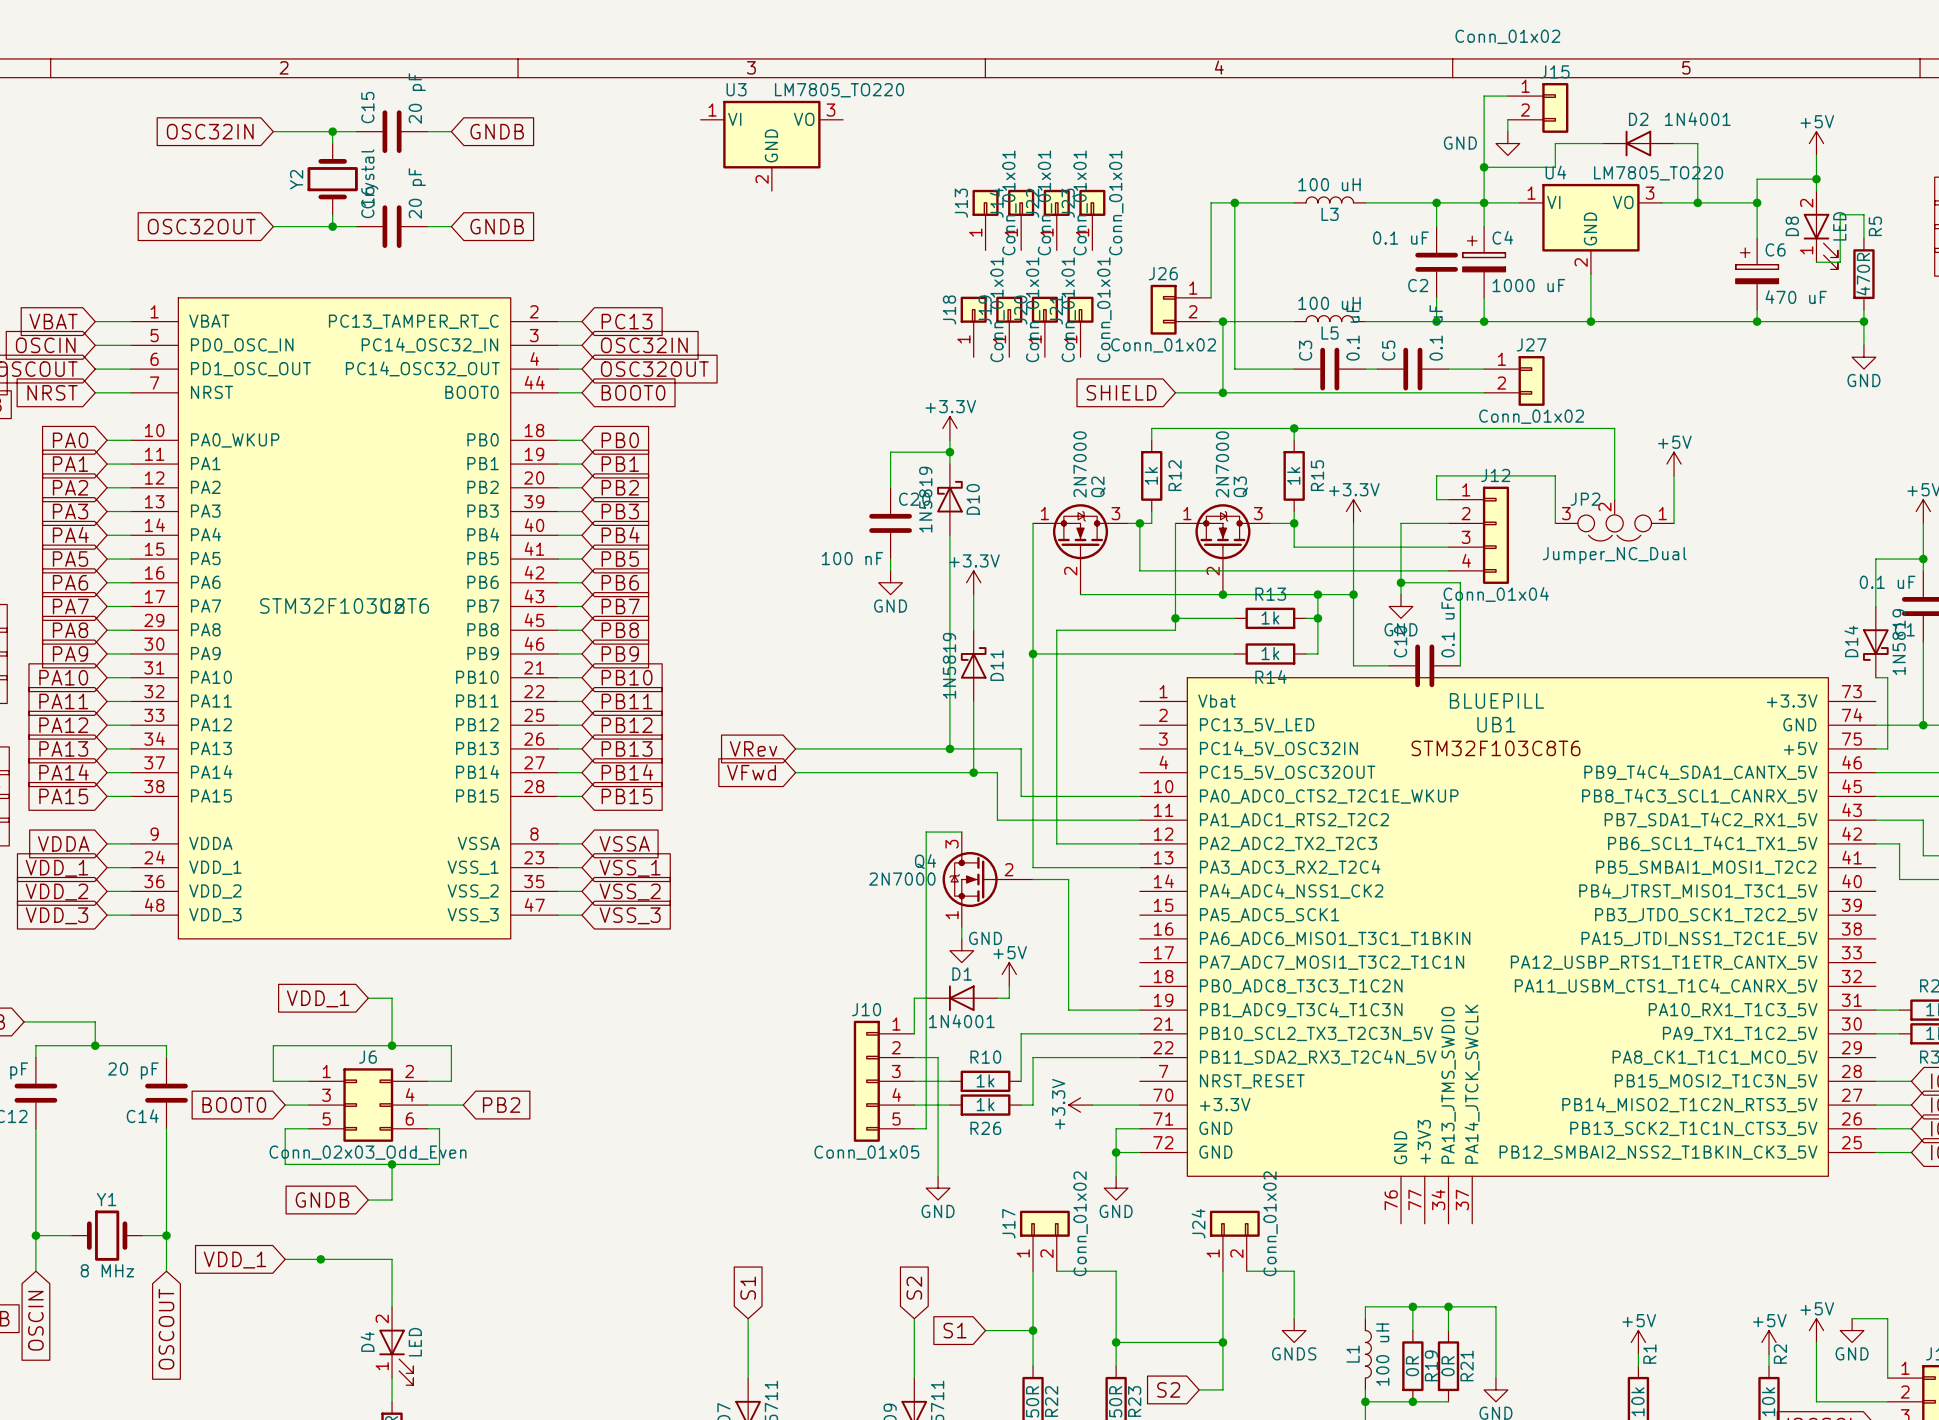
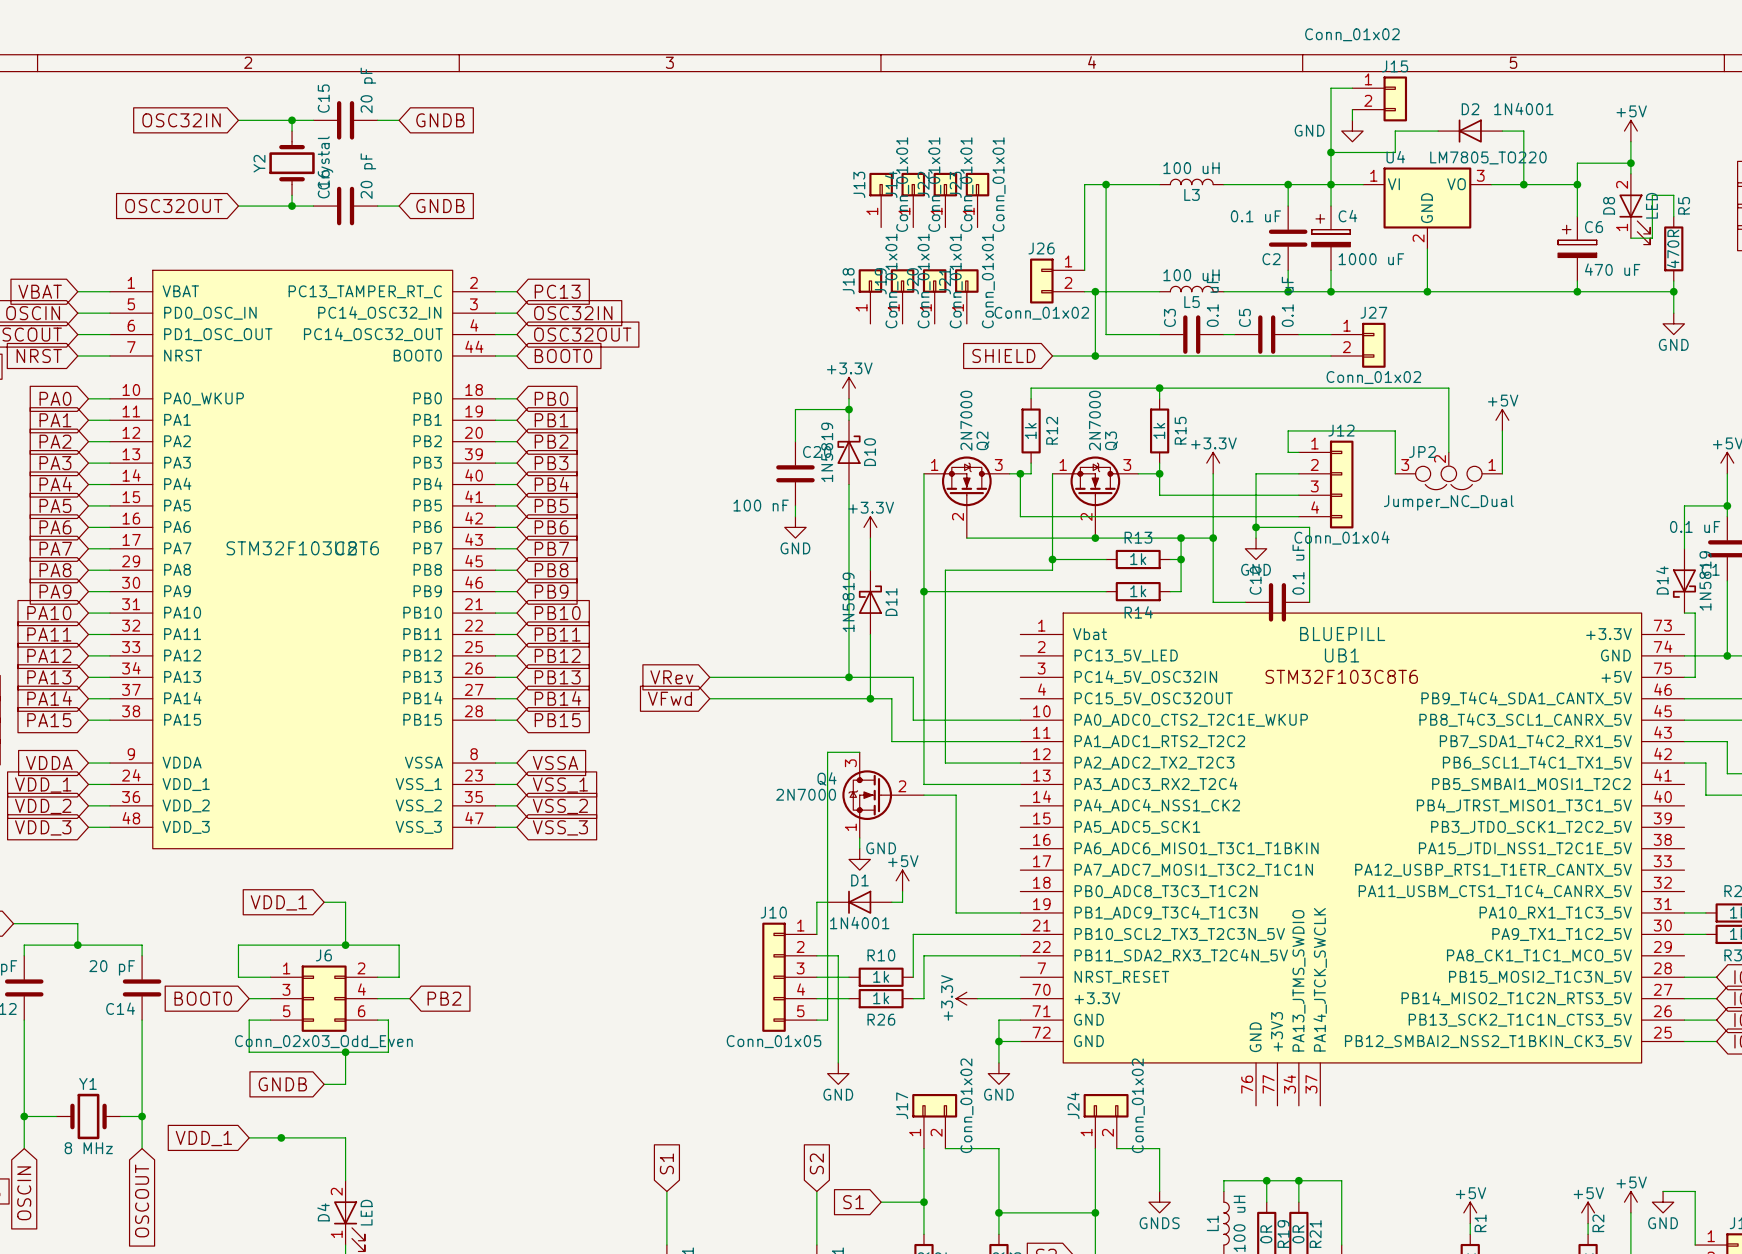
U3: LM7805_TO220 (771, 145) -> none

